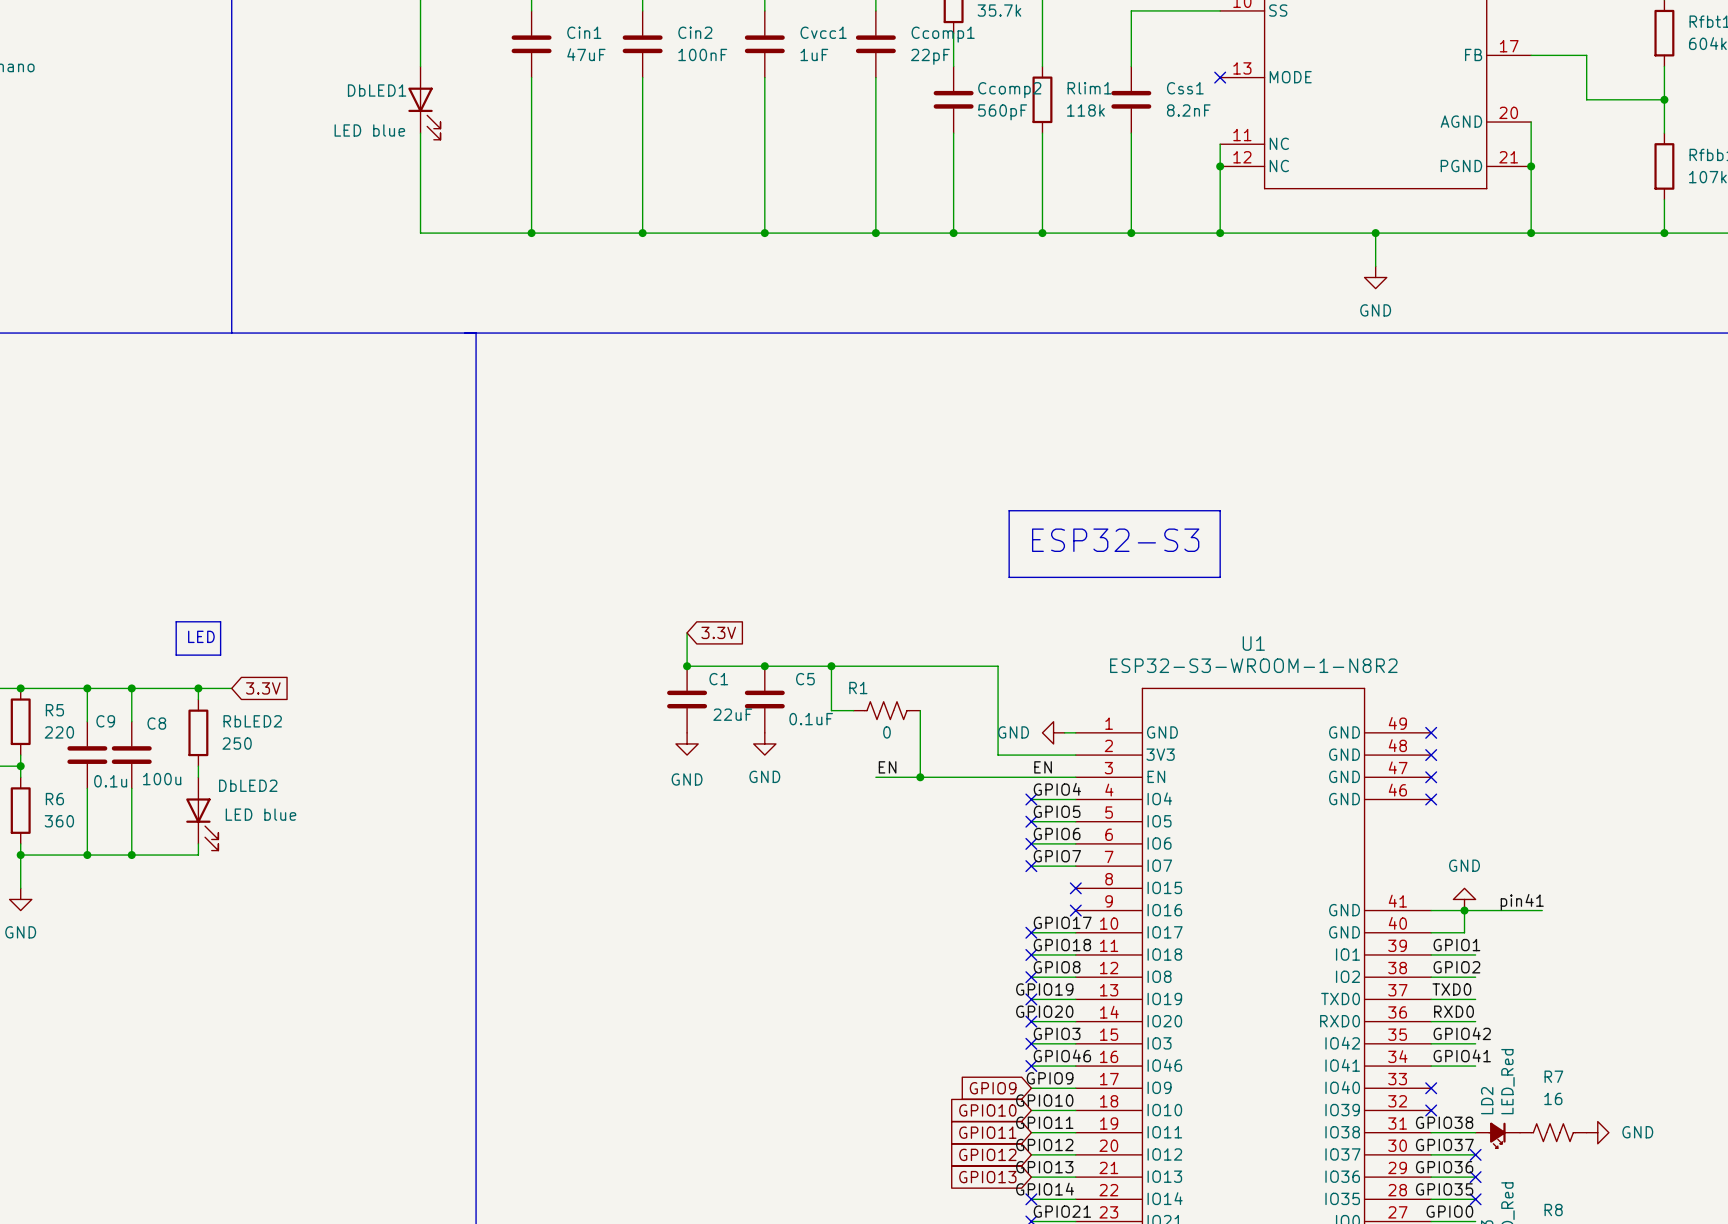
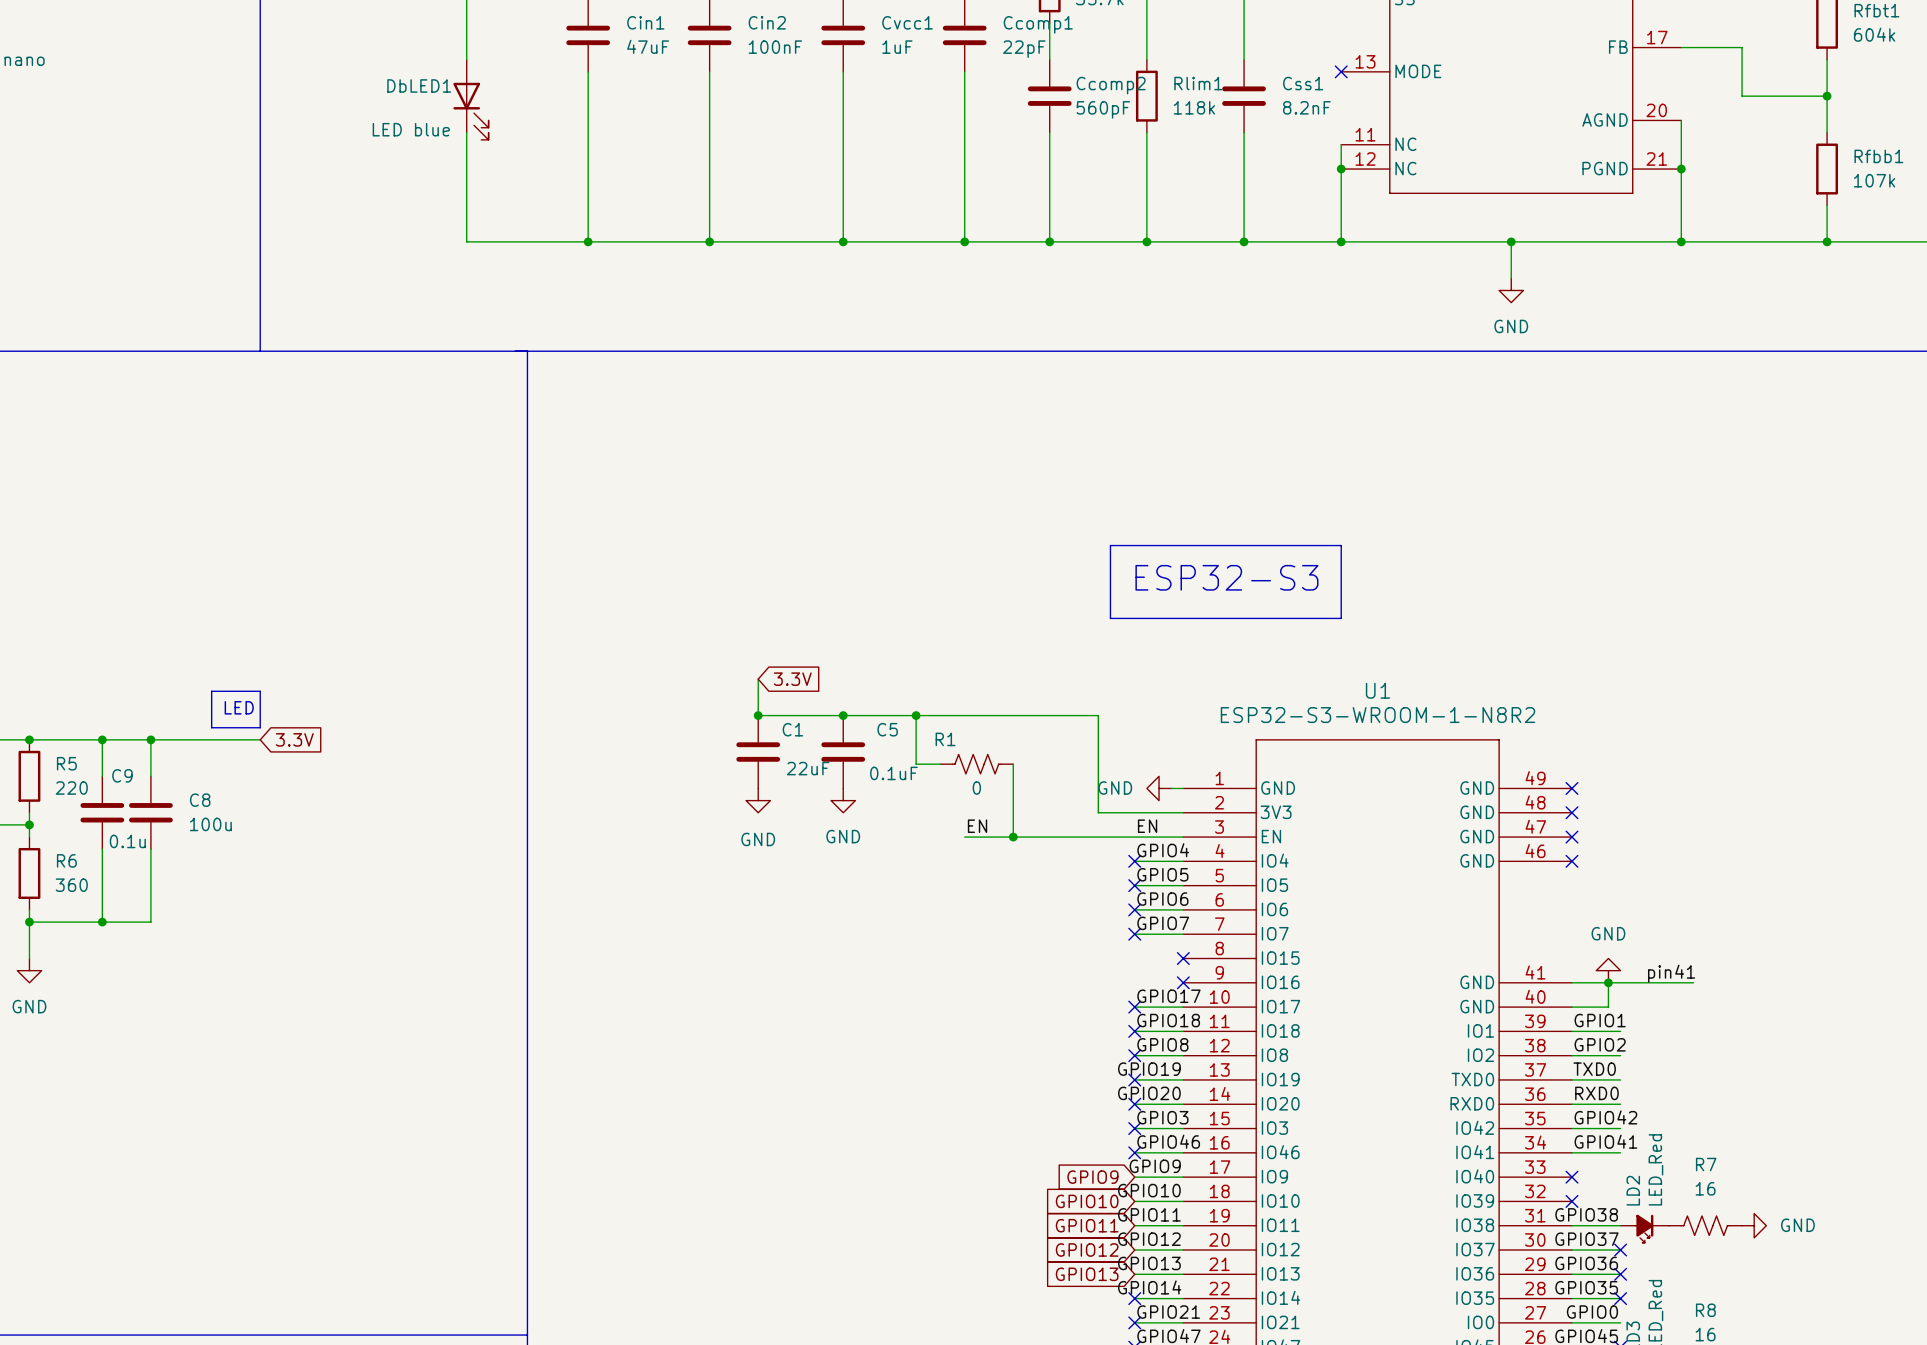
line: (176, 621) (220, 621) (220, 655) (176, 655) (176, 621) -> (211, 691) (260, 691) (260, 727) (211, 727) (211, 691)
text position: LED (201, 636) -> LED (239, 707)
wire: (198, 688) (198, 699) -> none
junction: (198, 688) -> none
C8 name position: C8 (156, 723) -> C8 (200, 800)
RbLED2: 250 (198, 732) -> none
wire: (198, 766) (198, 777) -> none
C8 value position: 100u (162, 779) -> 100u (210, 824)
DbLED2: LED blue (202, 813) -> none
wire: (198, 843) (198, 855) (131, 855) -> none
junction: (131, 855) -> none

